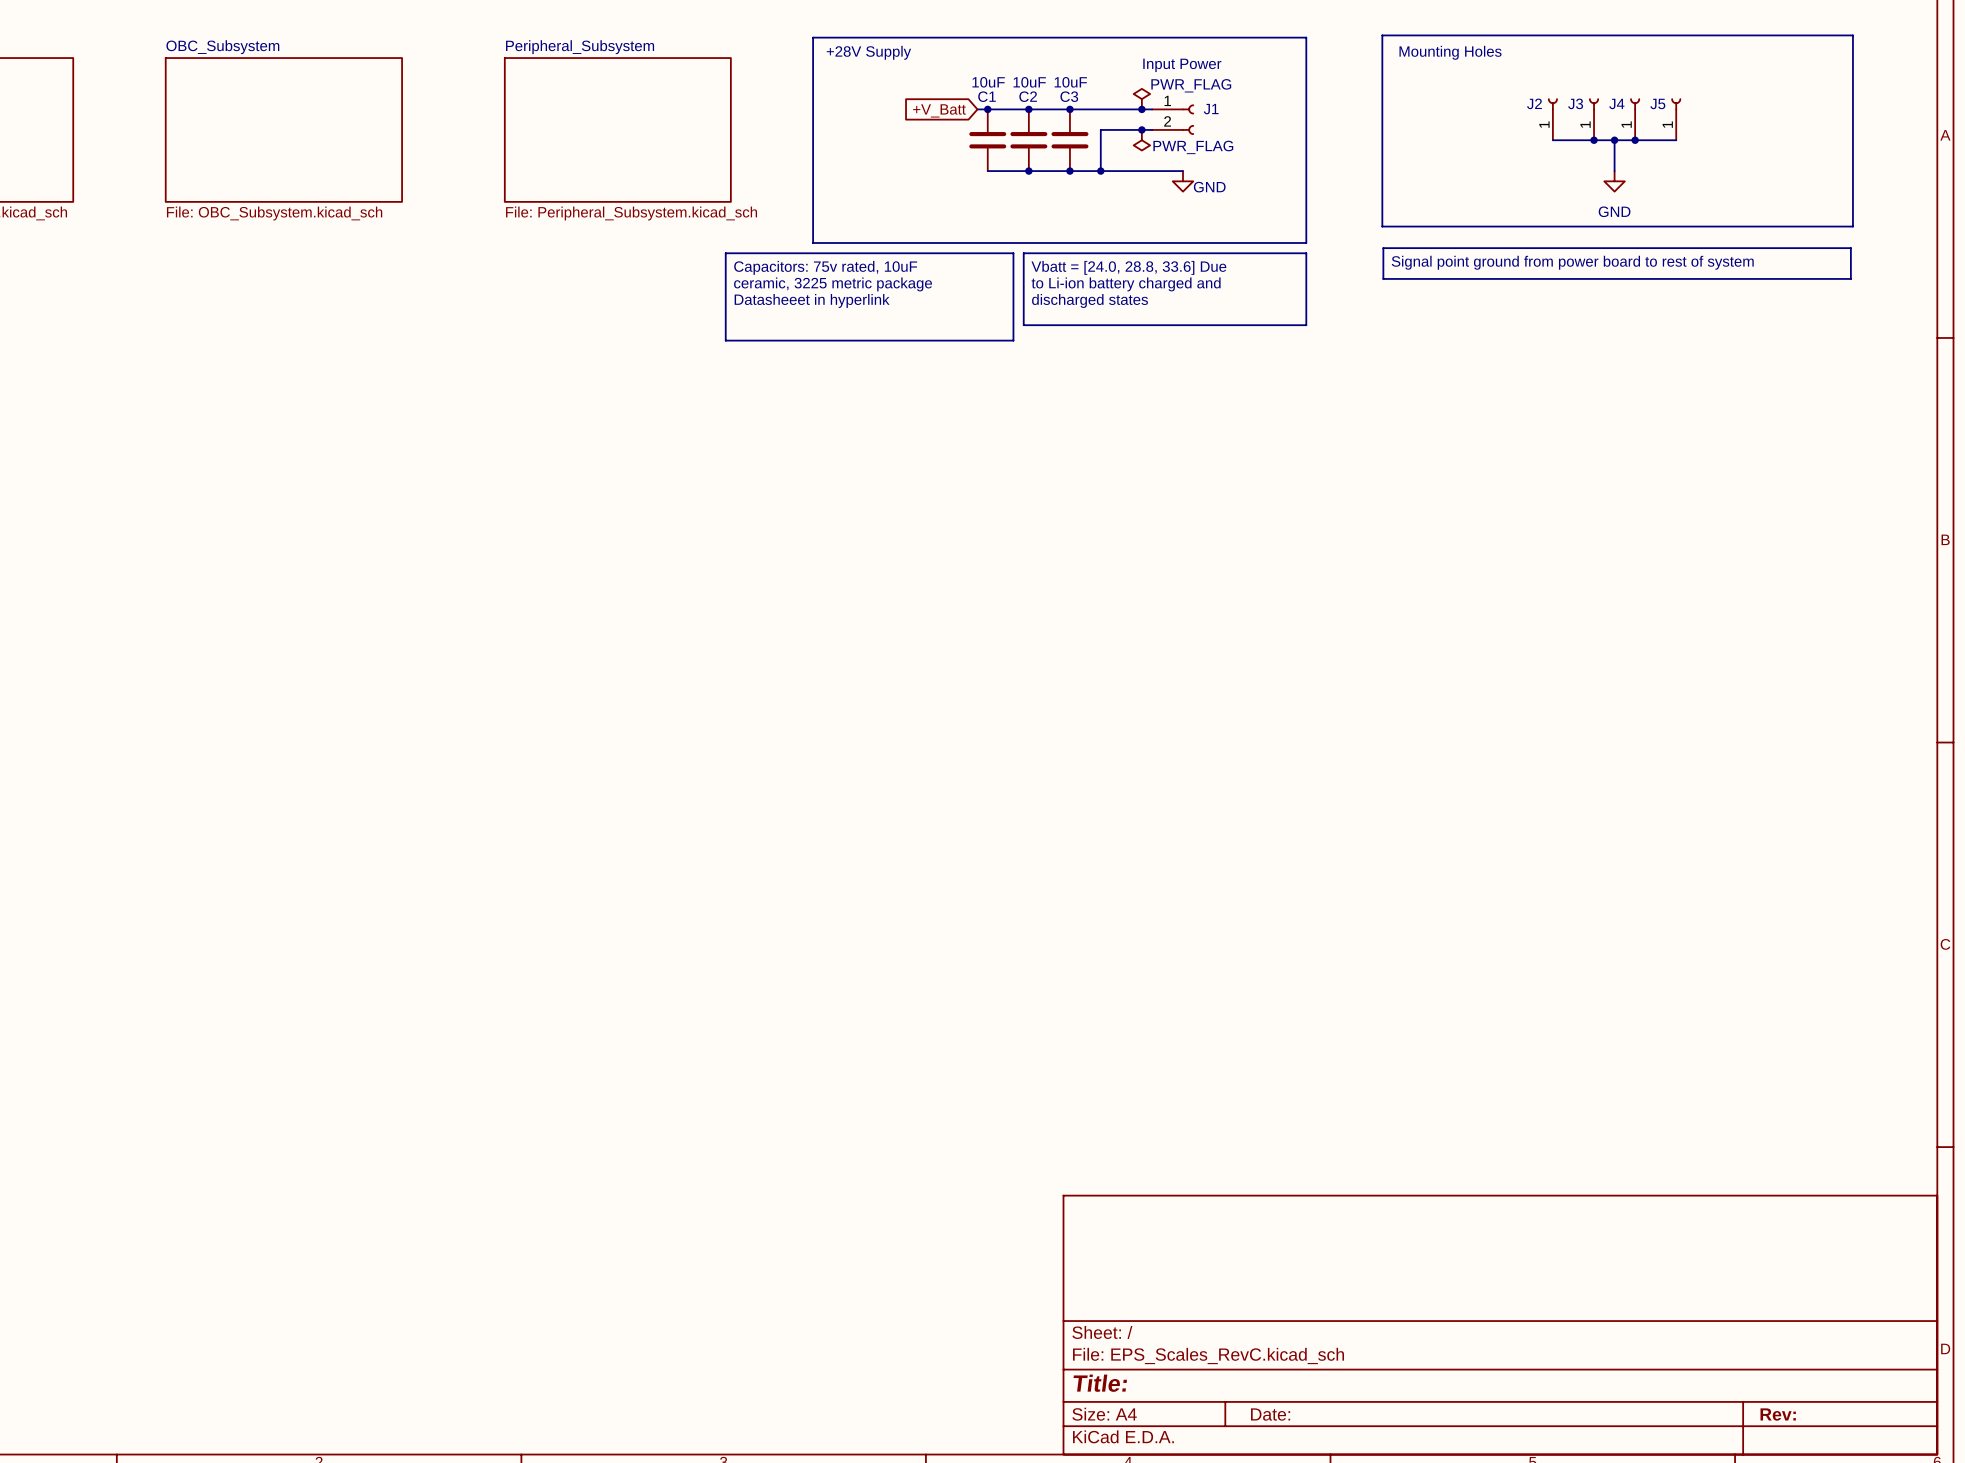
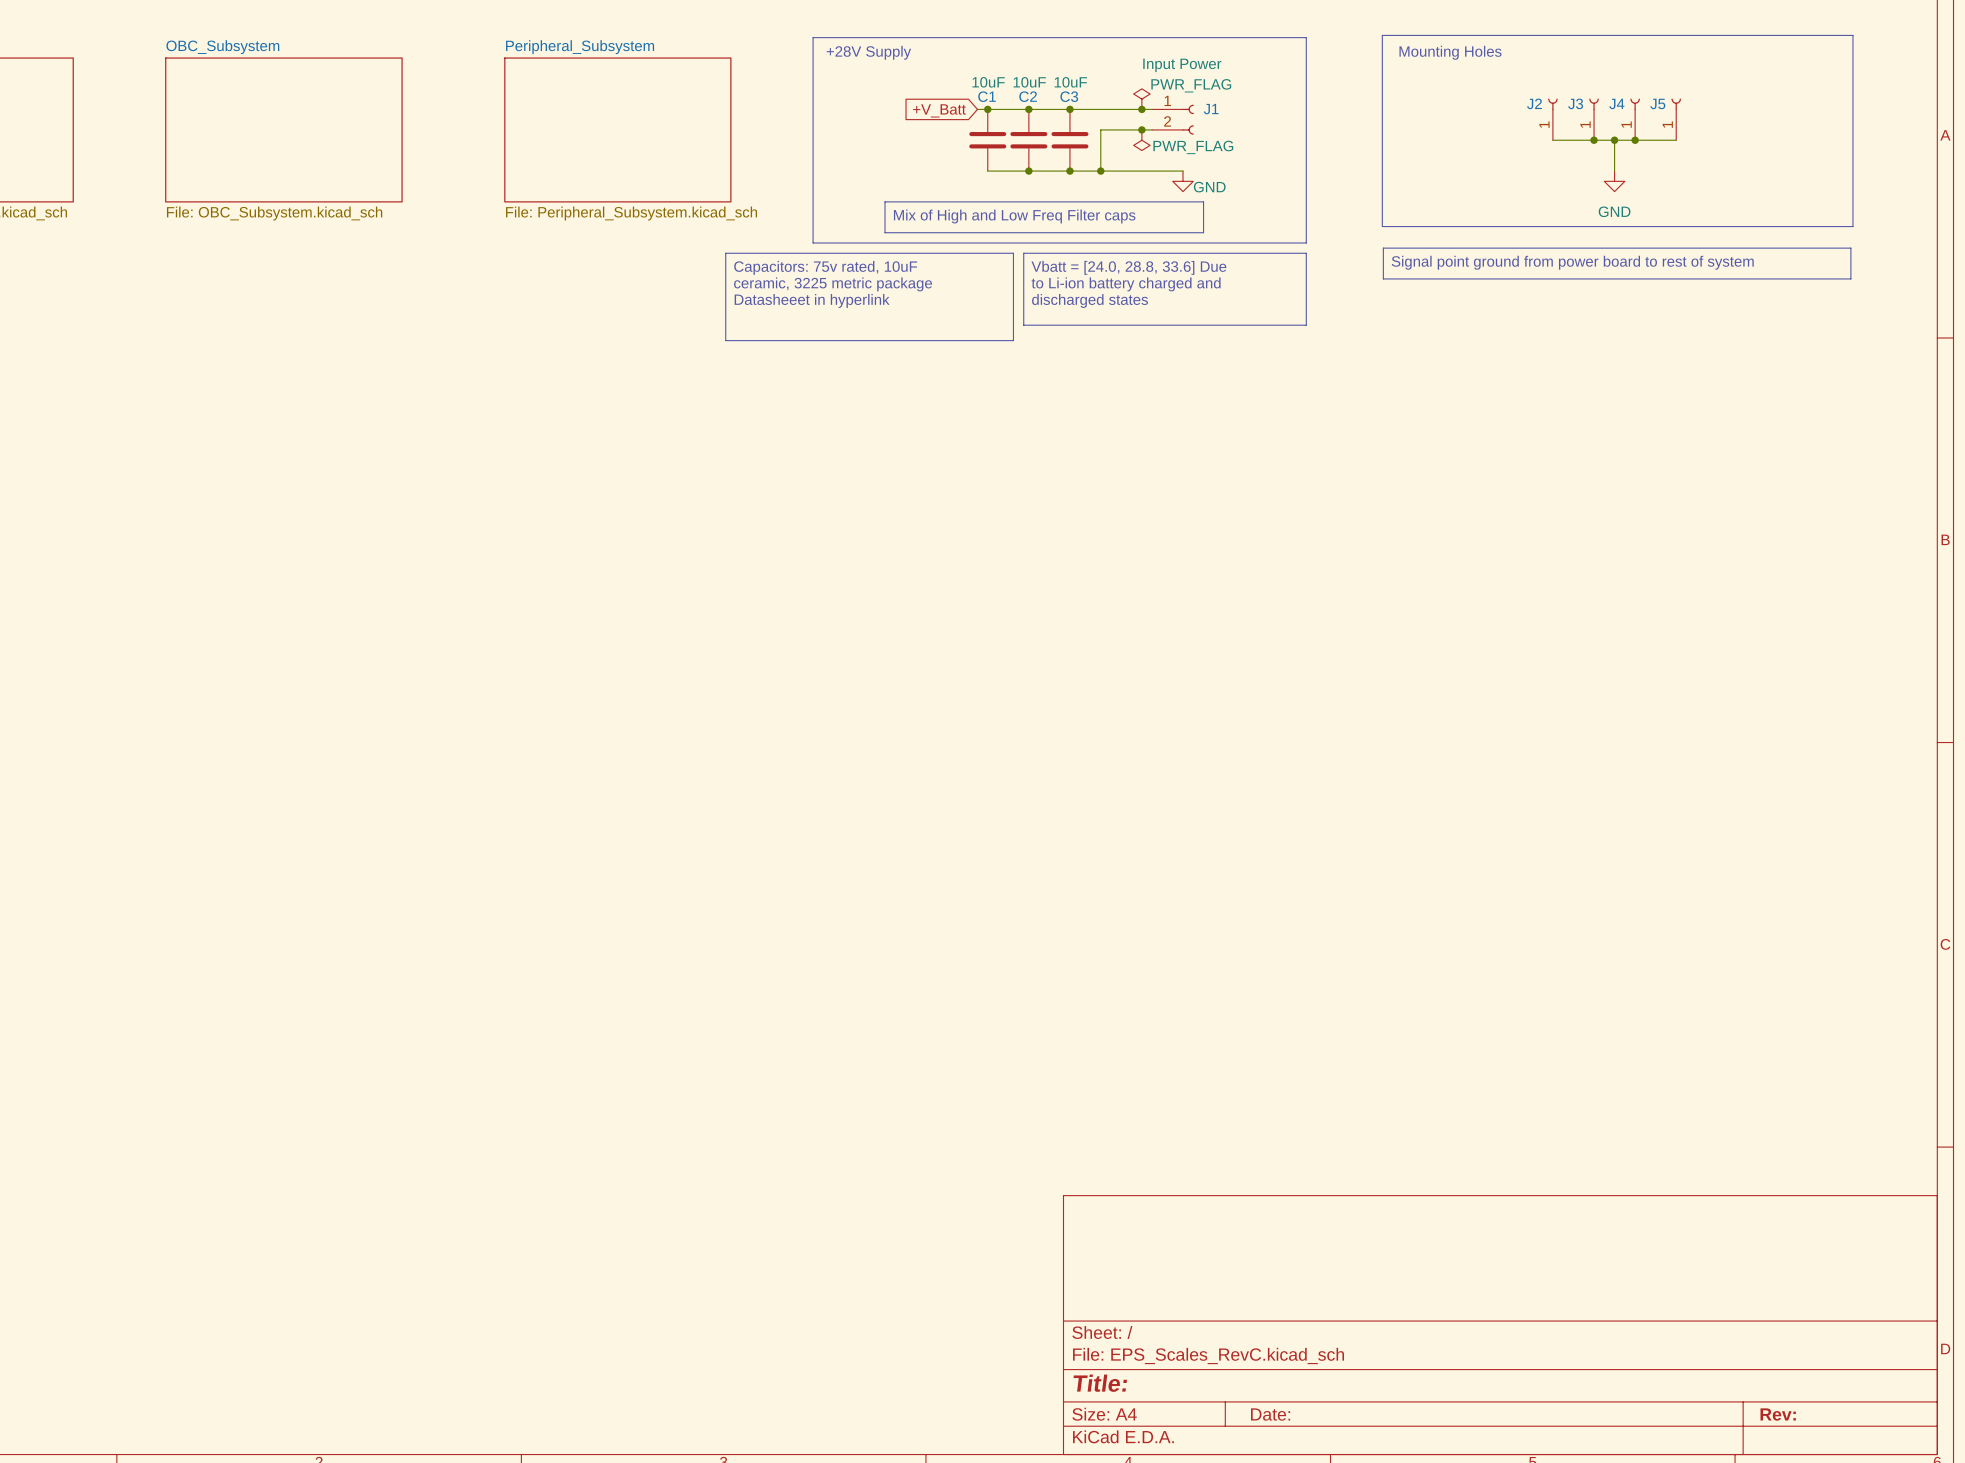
line: none -> (885, 201) (1203, 201) (1203, 232) (885, 232) (885, 201)
text: none -> Mix of High and Low Freq Filter caps (1014, 216)

